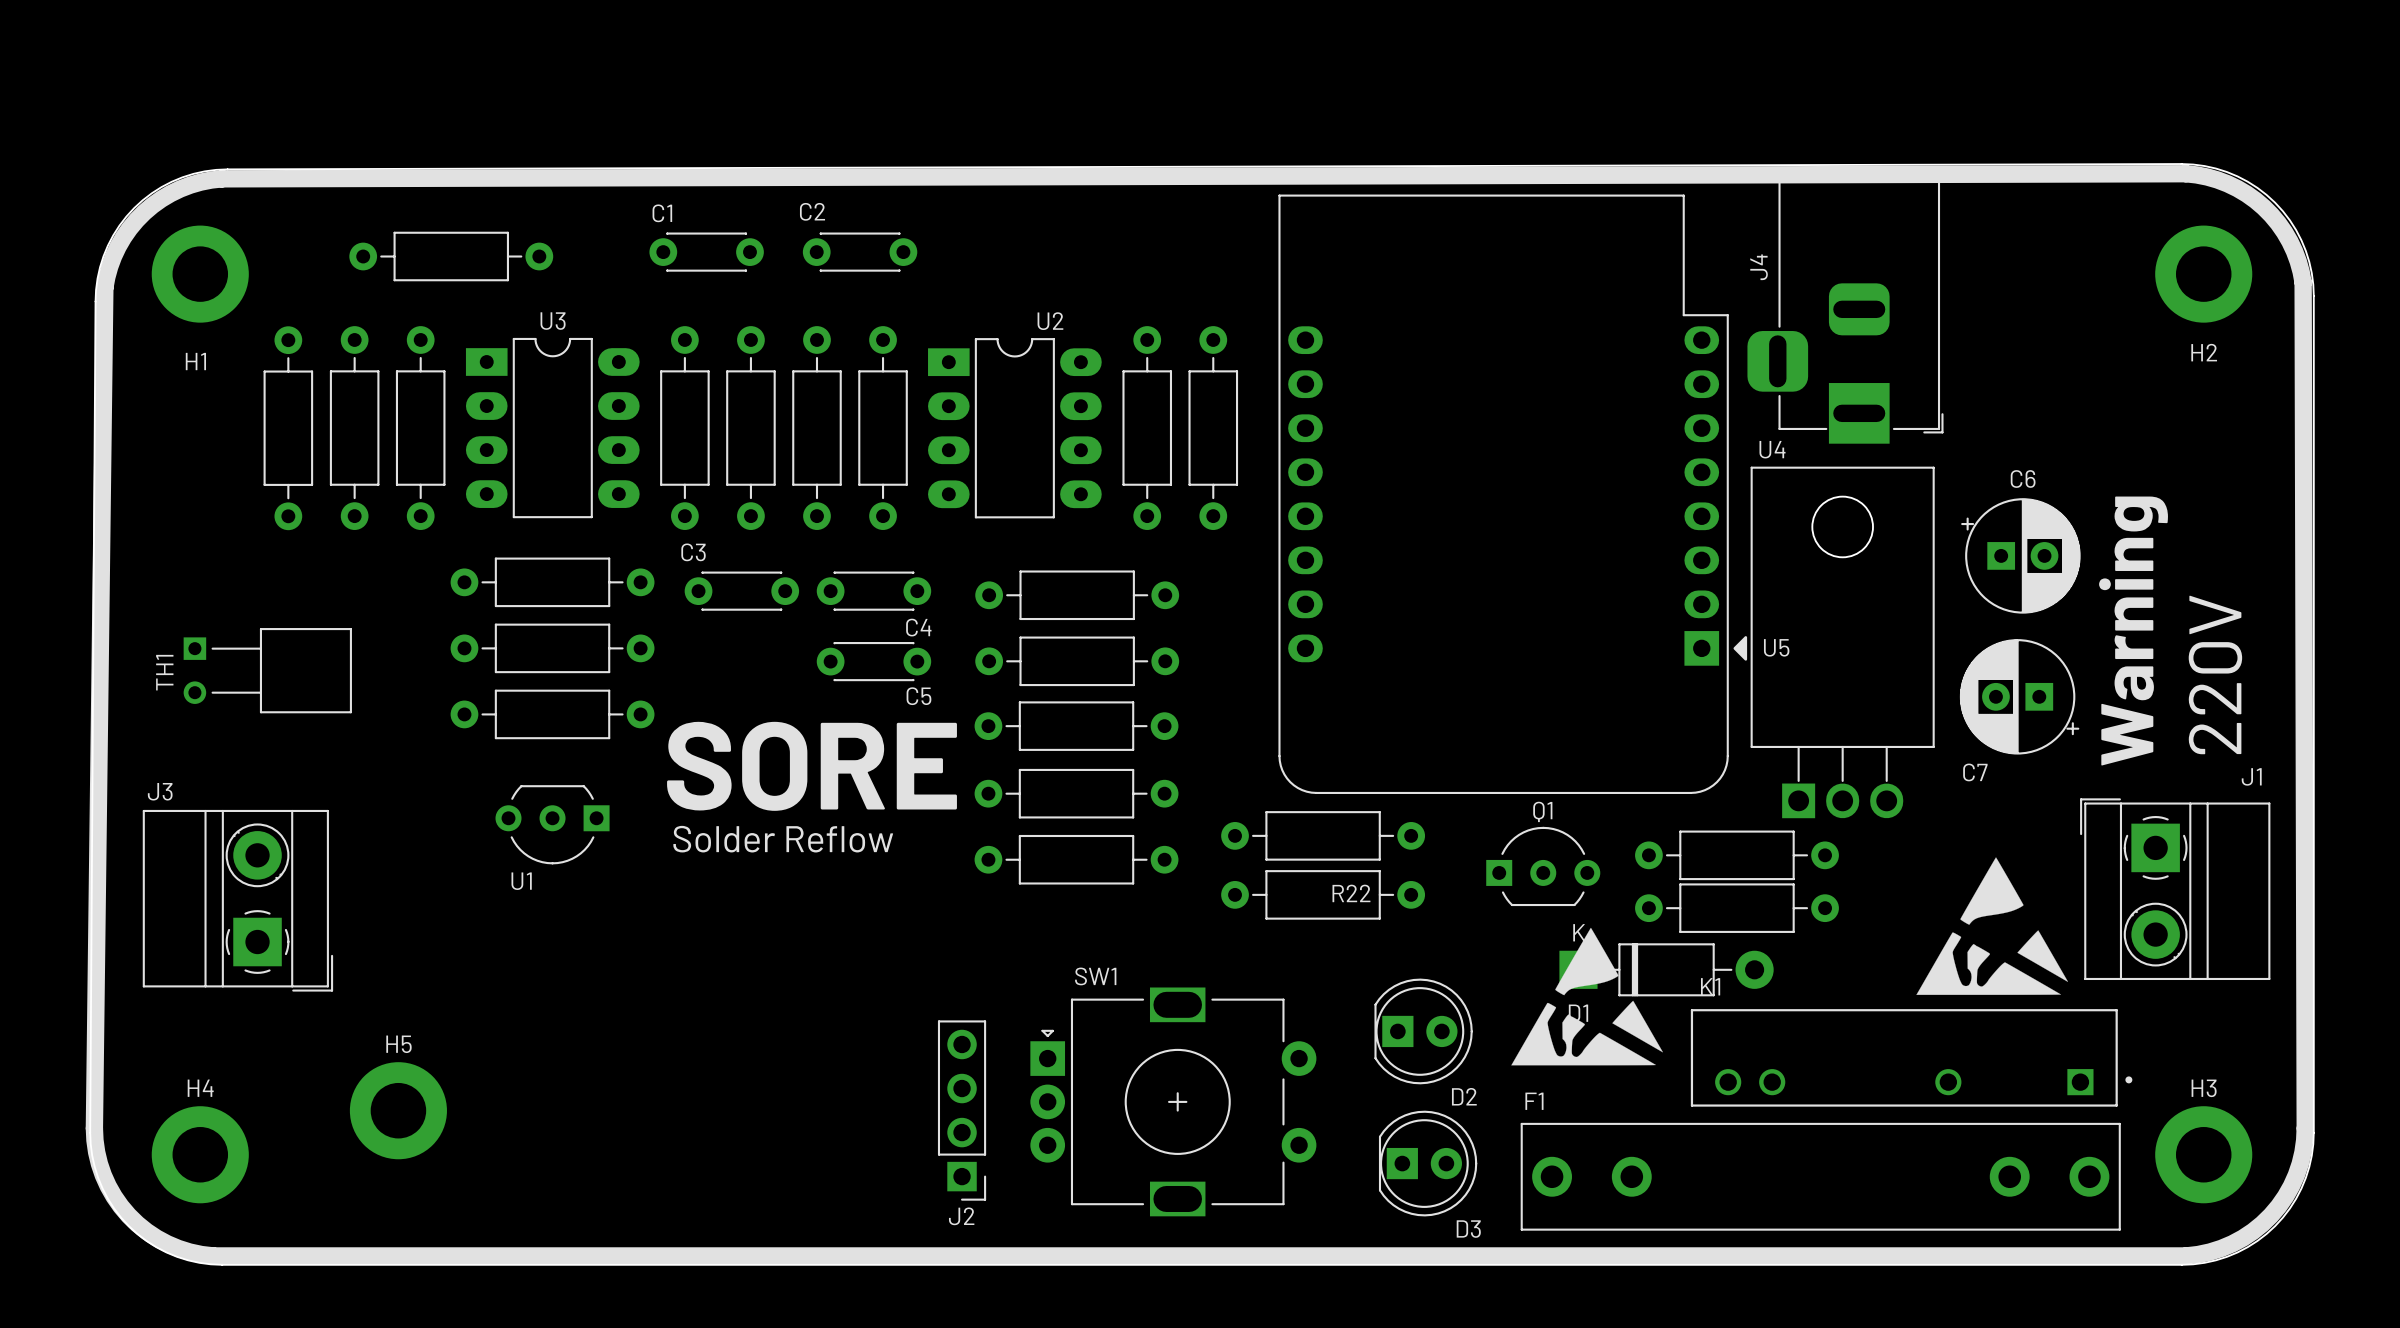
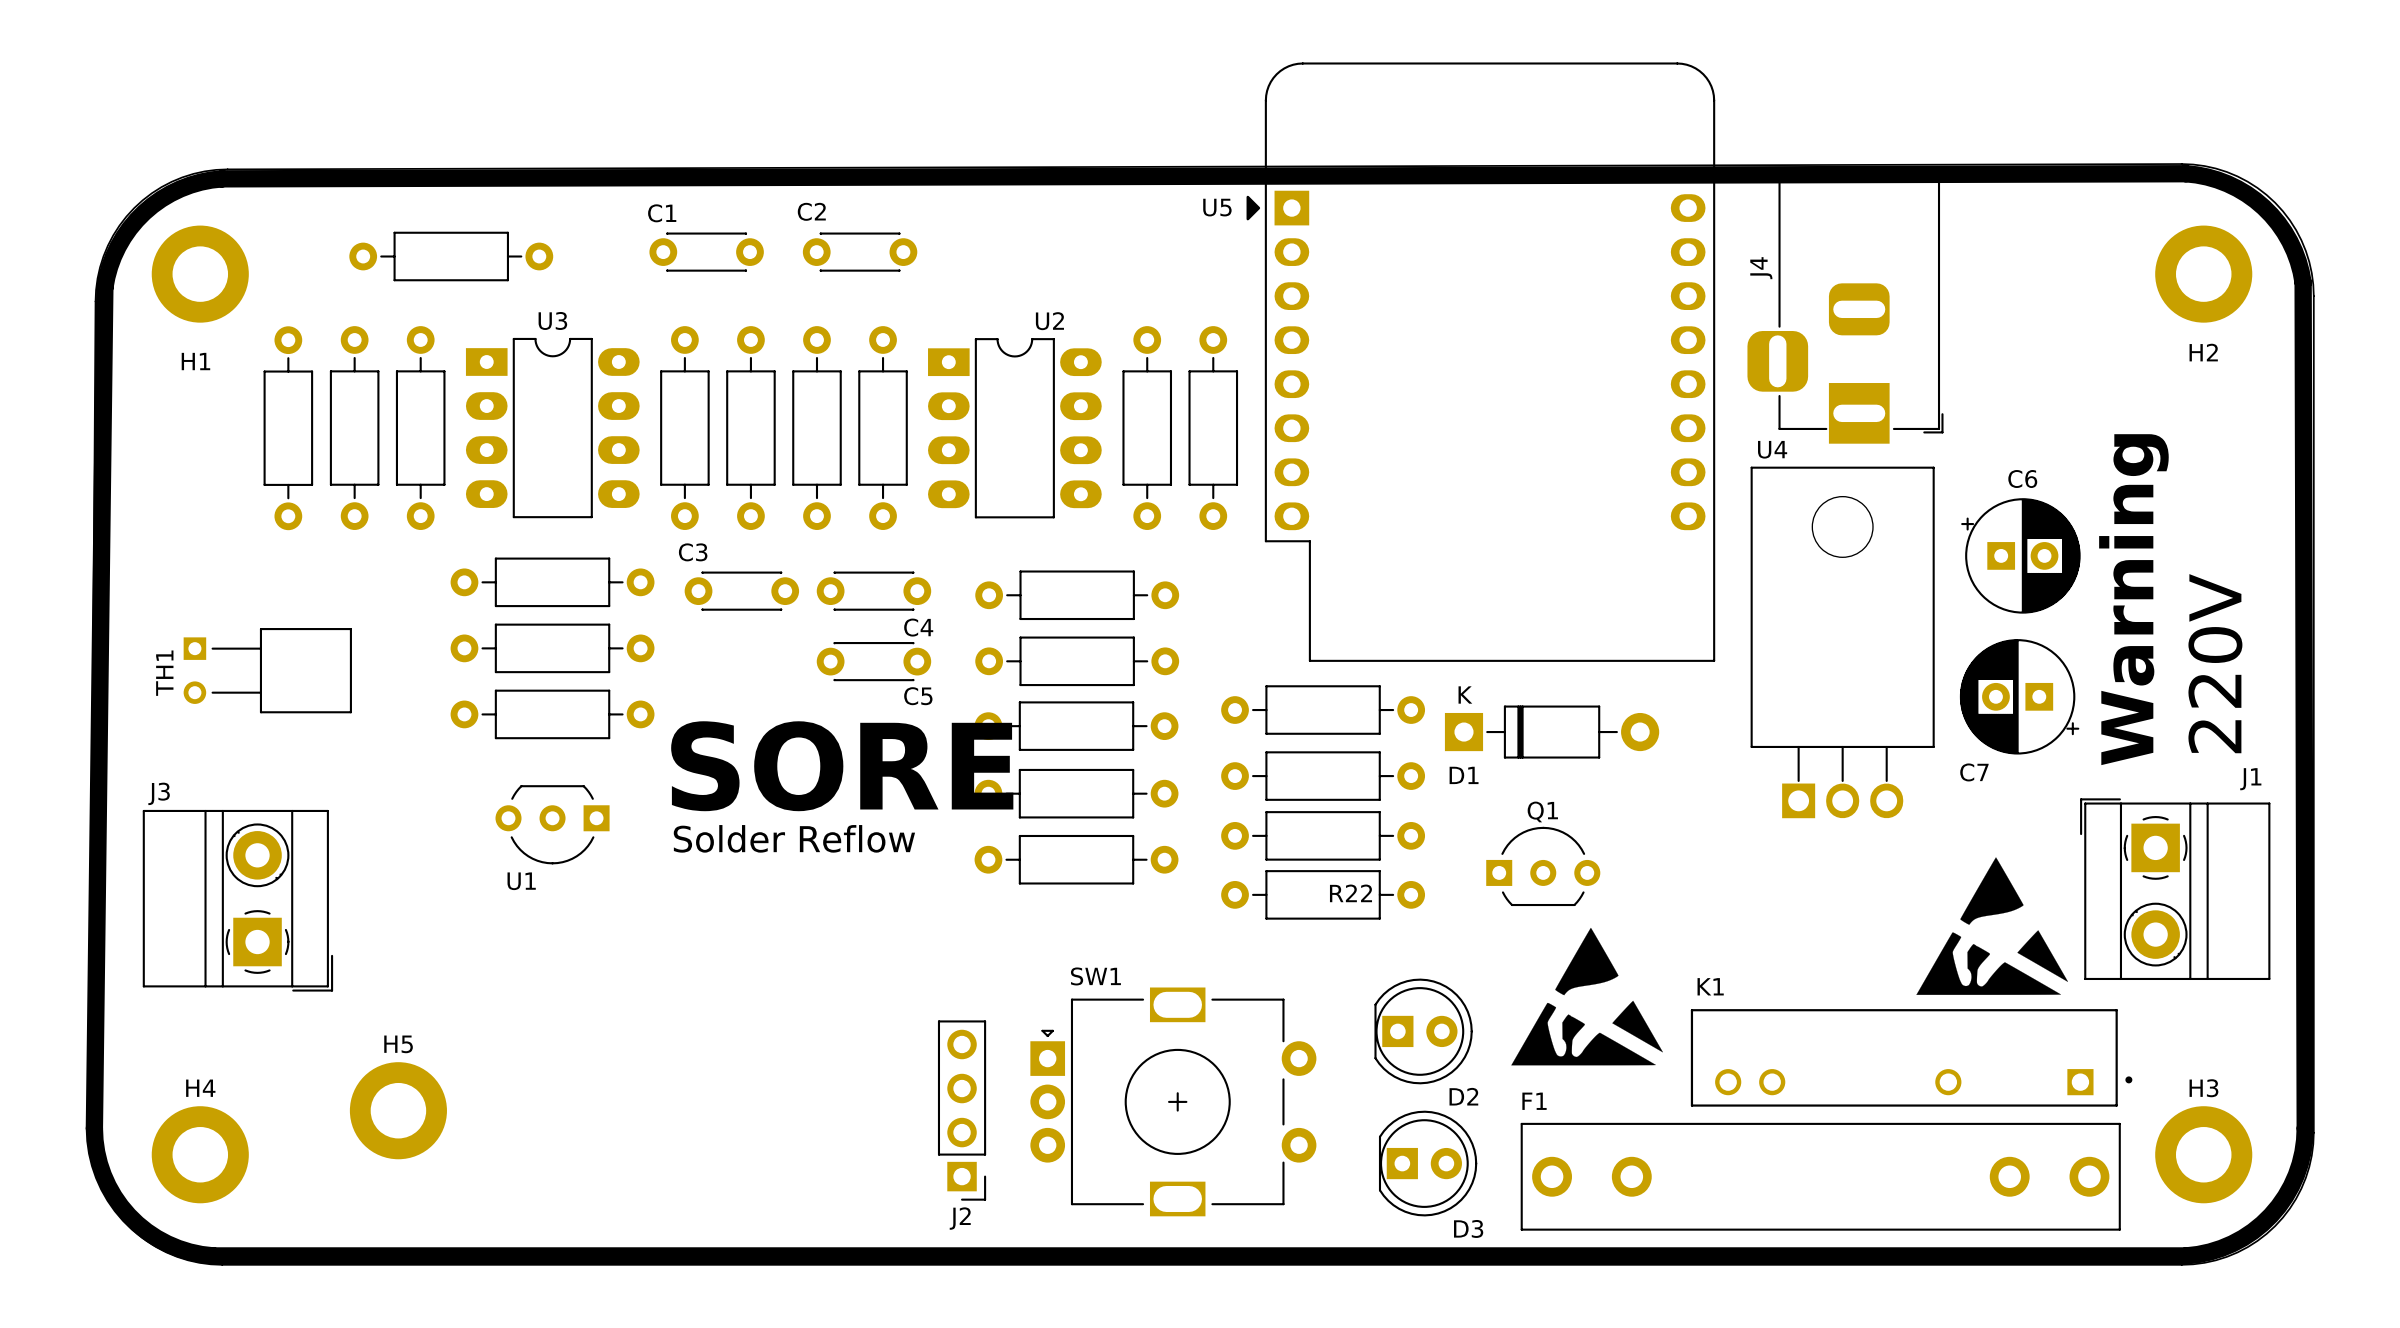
U5 rotation: 0° (1512, 494) -> 180° (1480, 362)
part: none -> (1323, 710)
part: none -> (1323, 776)
part: (1736, 855) -> none
part: (1736, 908) -> none
D1 position: (1666, 969) -> (1552, 732)

